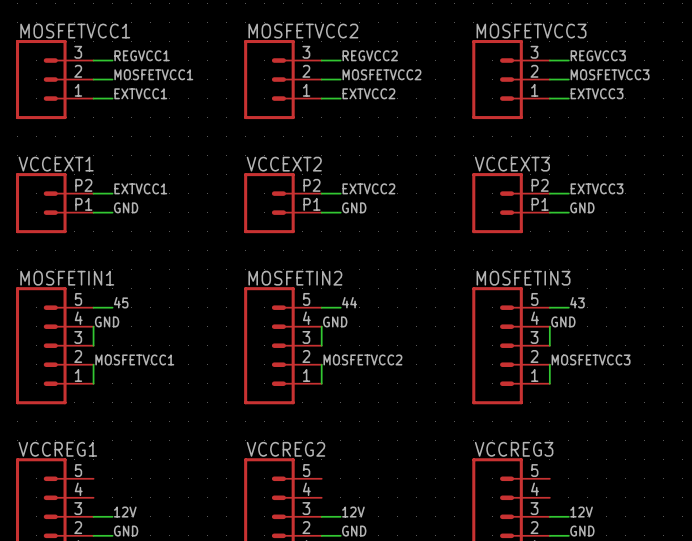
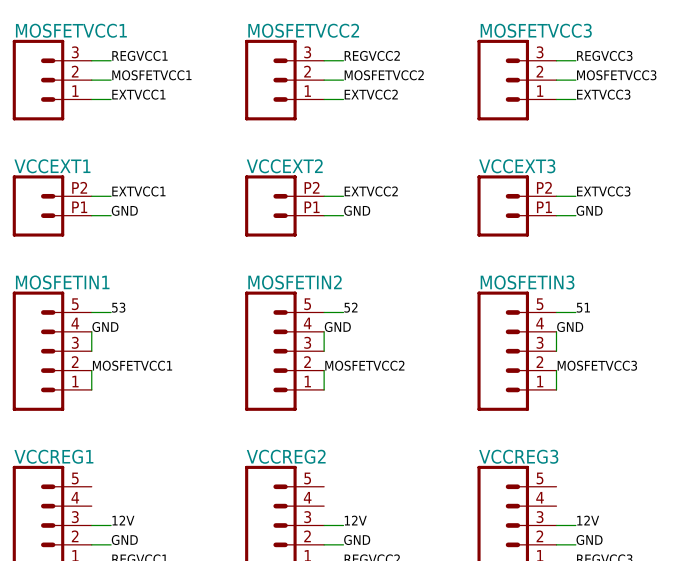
label: 45 (121, 302) -> 53 (118, 307)
label: 44 (349, 302) -> 52 (350, 307)
label: 43 (577, 302) -> 51 (583, 307)

